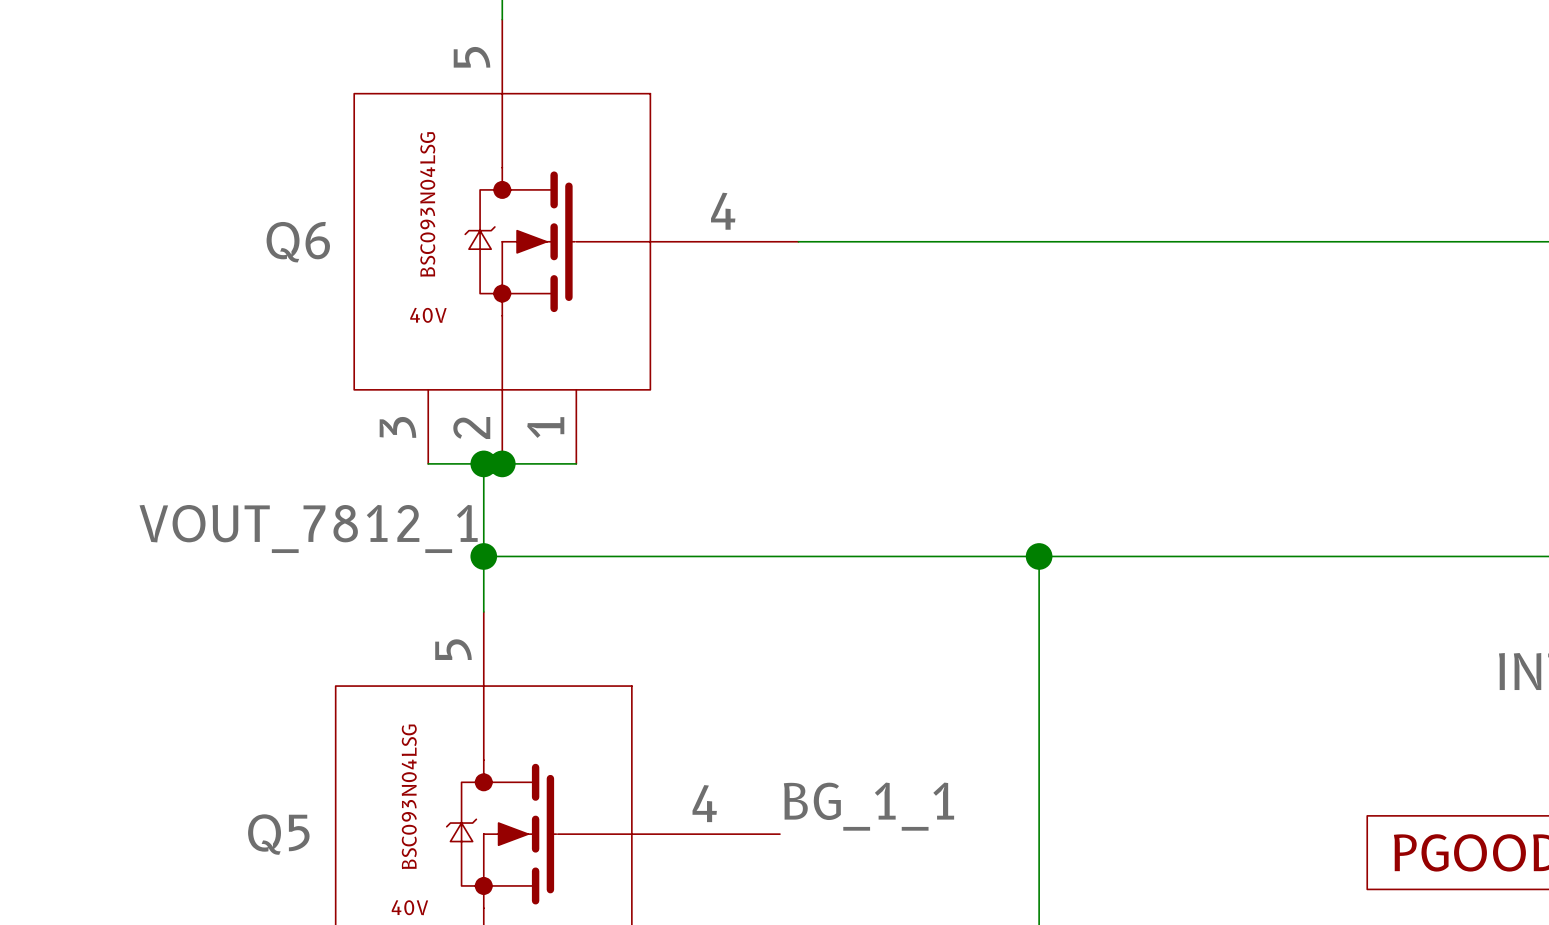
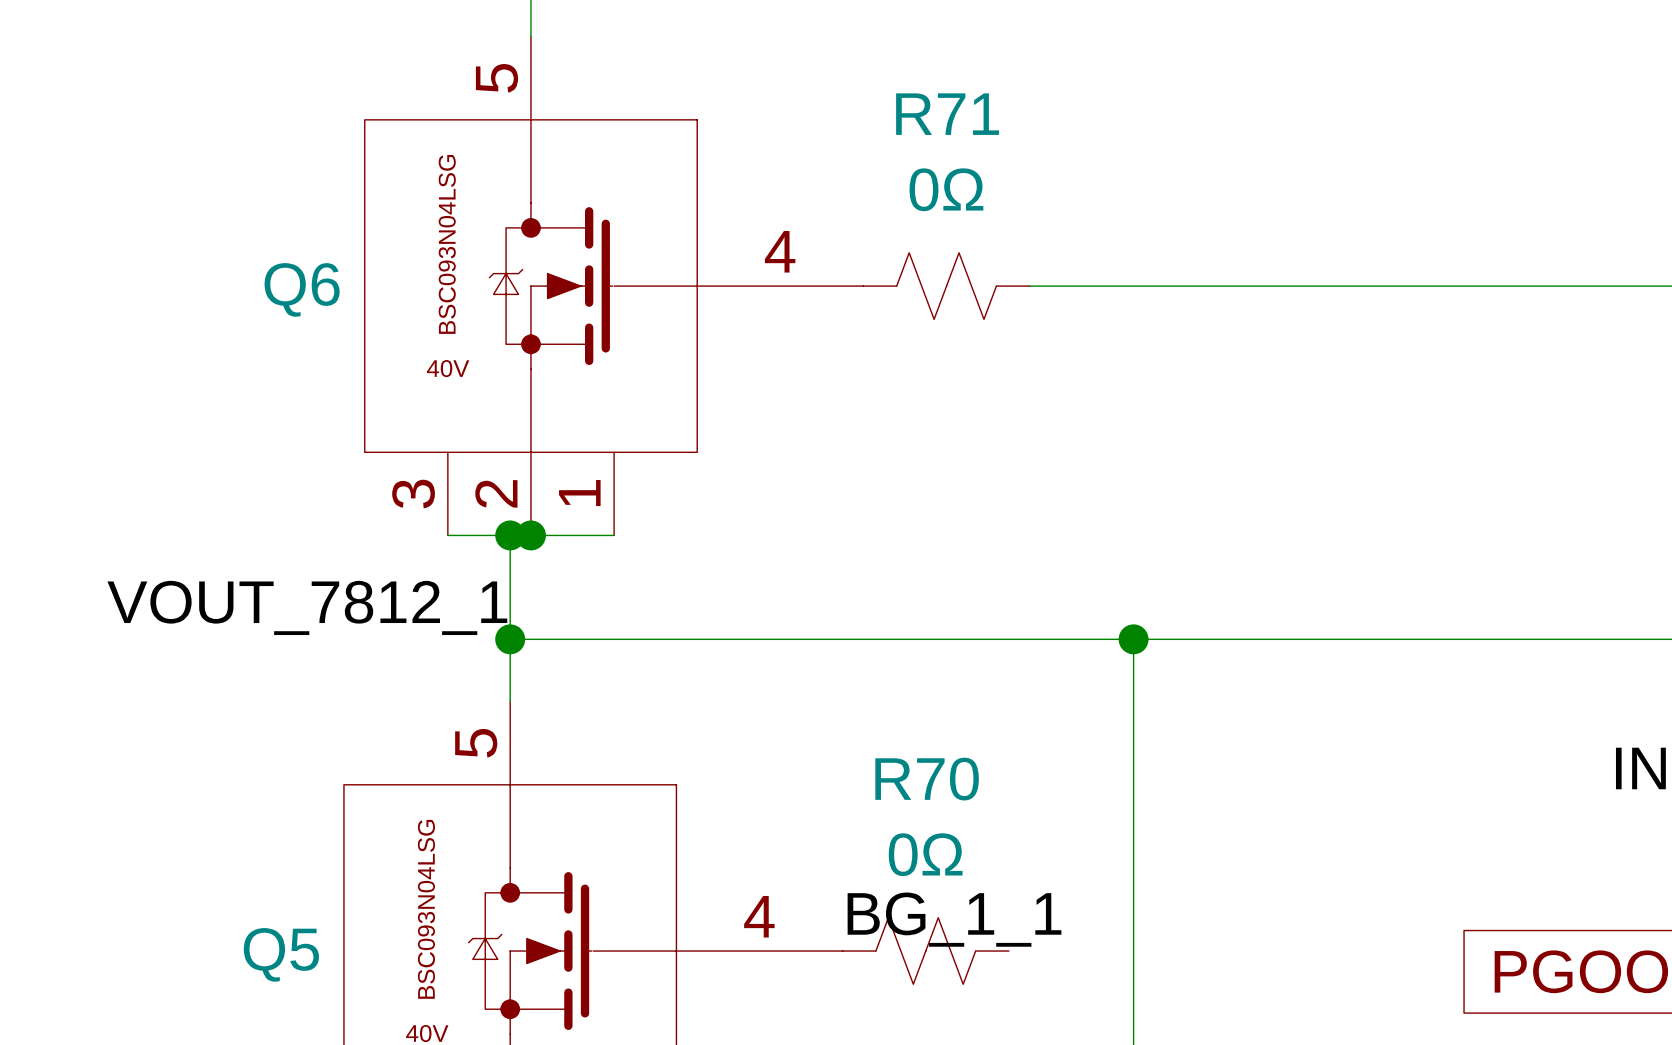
wire: (798, 241) (946, 241) -> none
R71: none -> (946, 286)
R70: none -> (925, 951)

